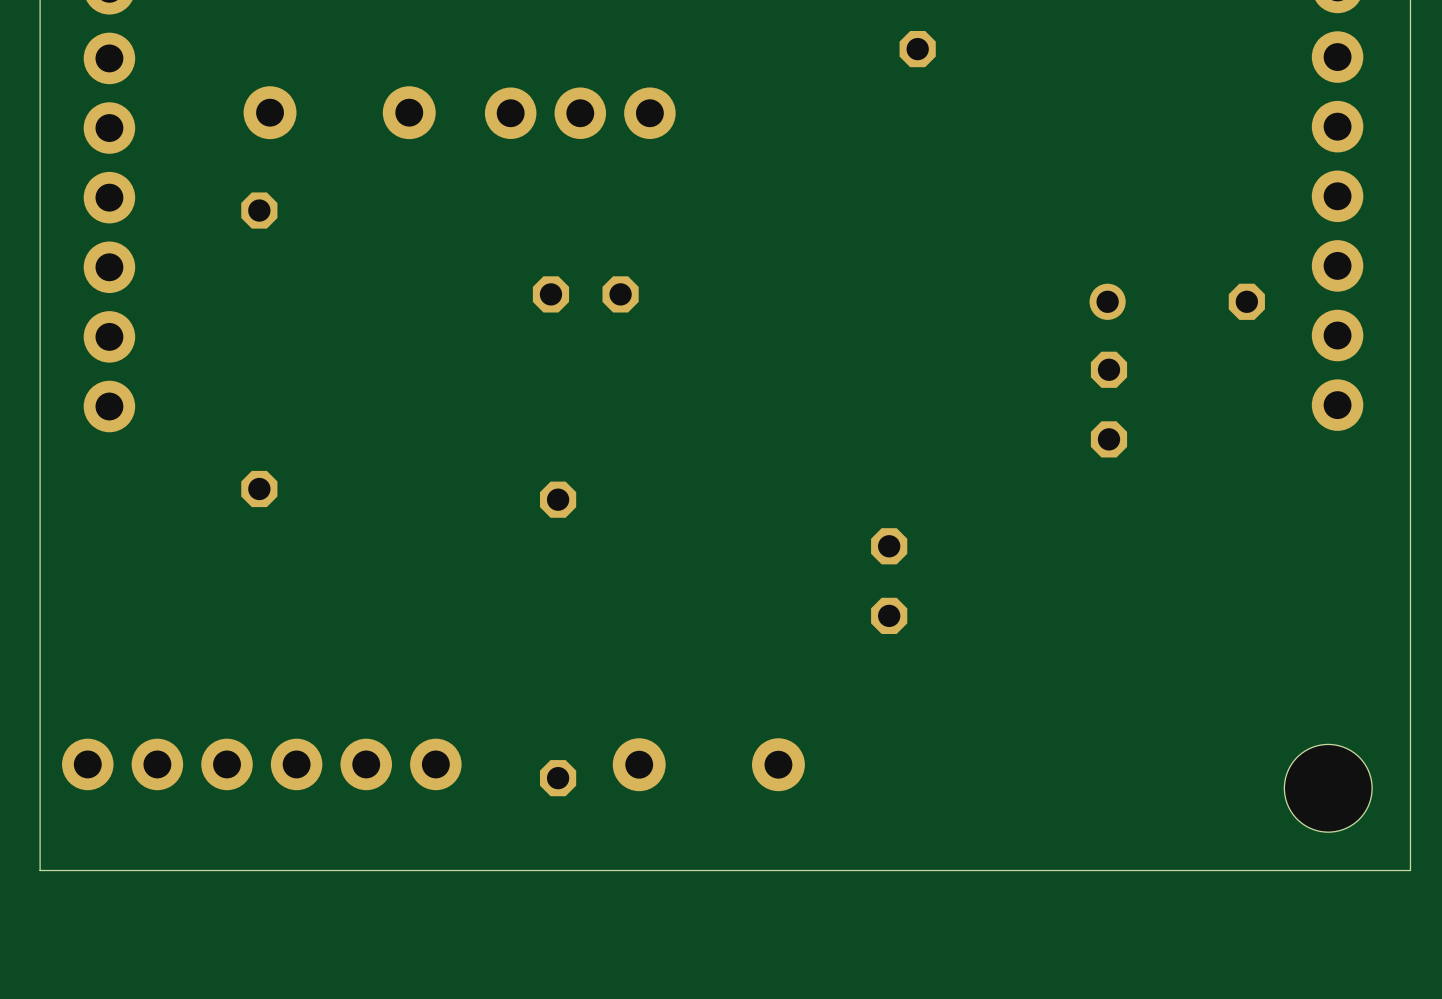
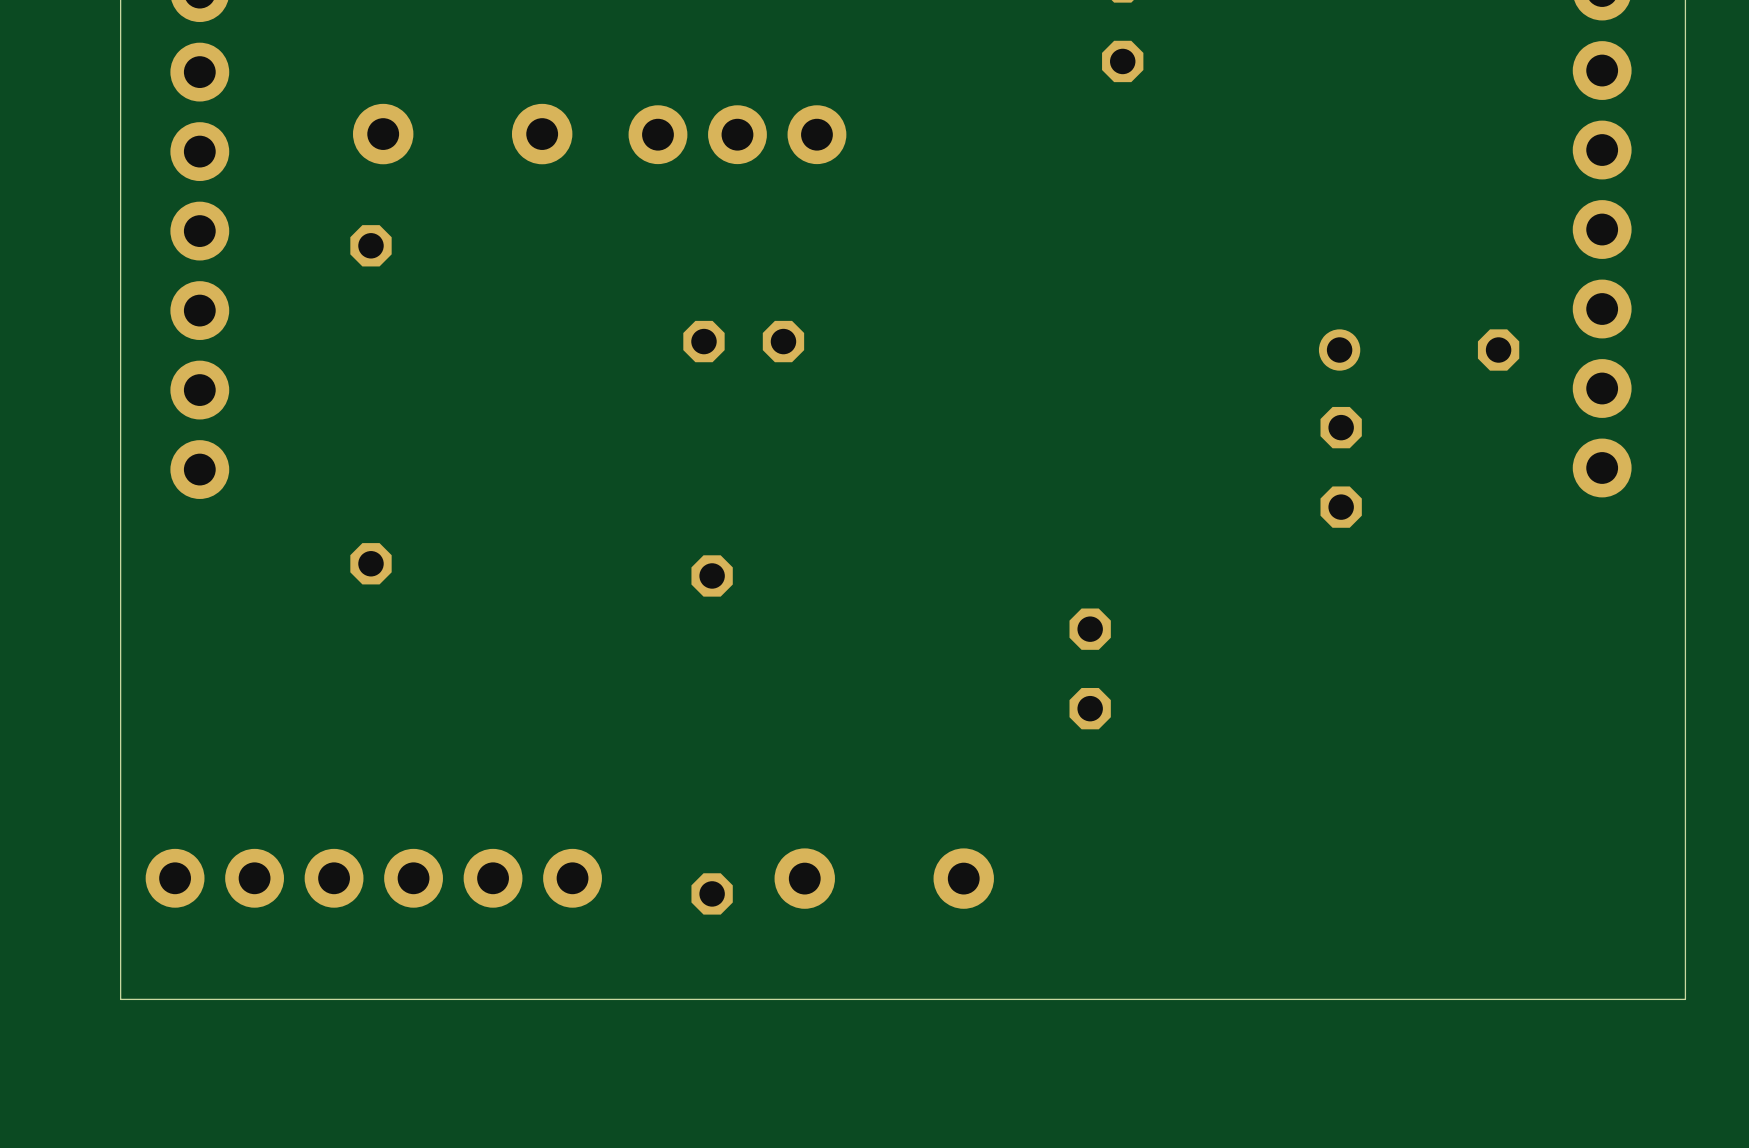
hole: (1328, 788) -> none

